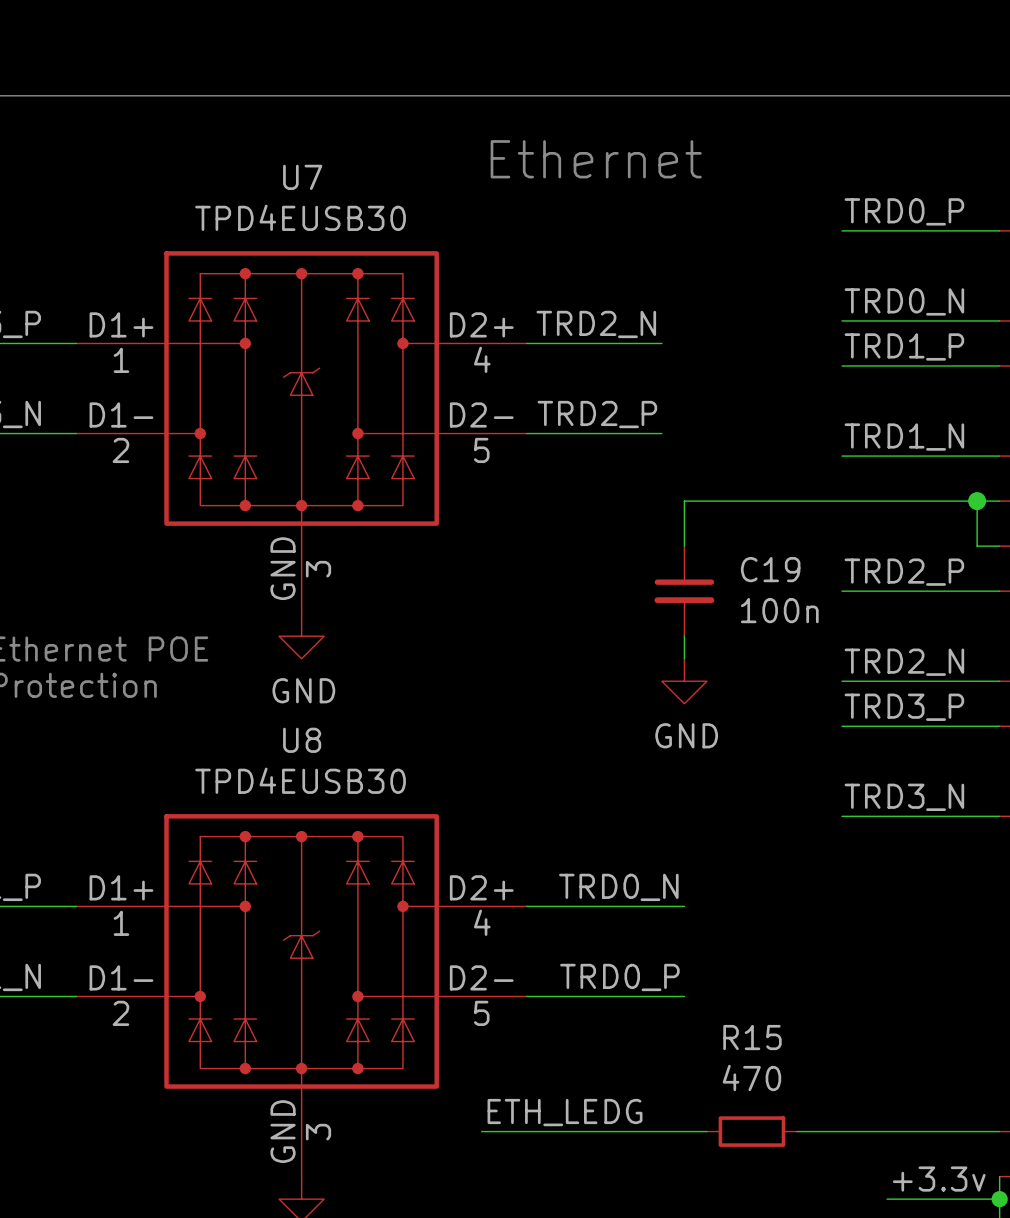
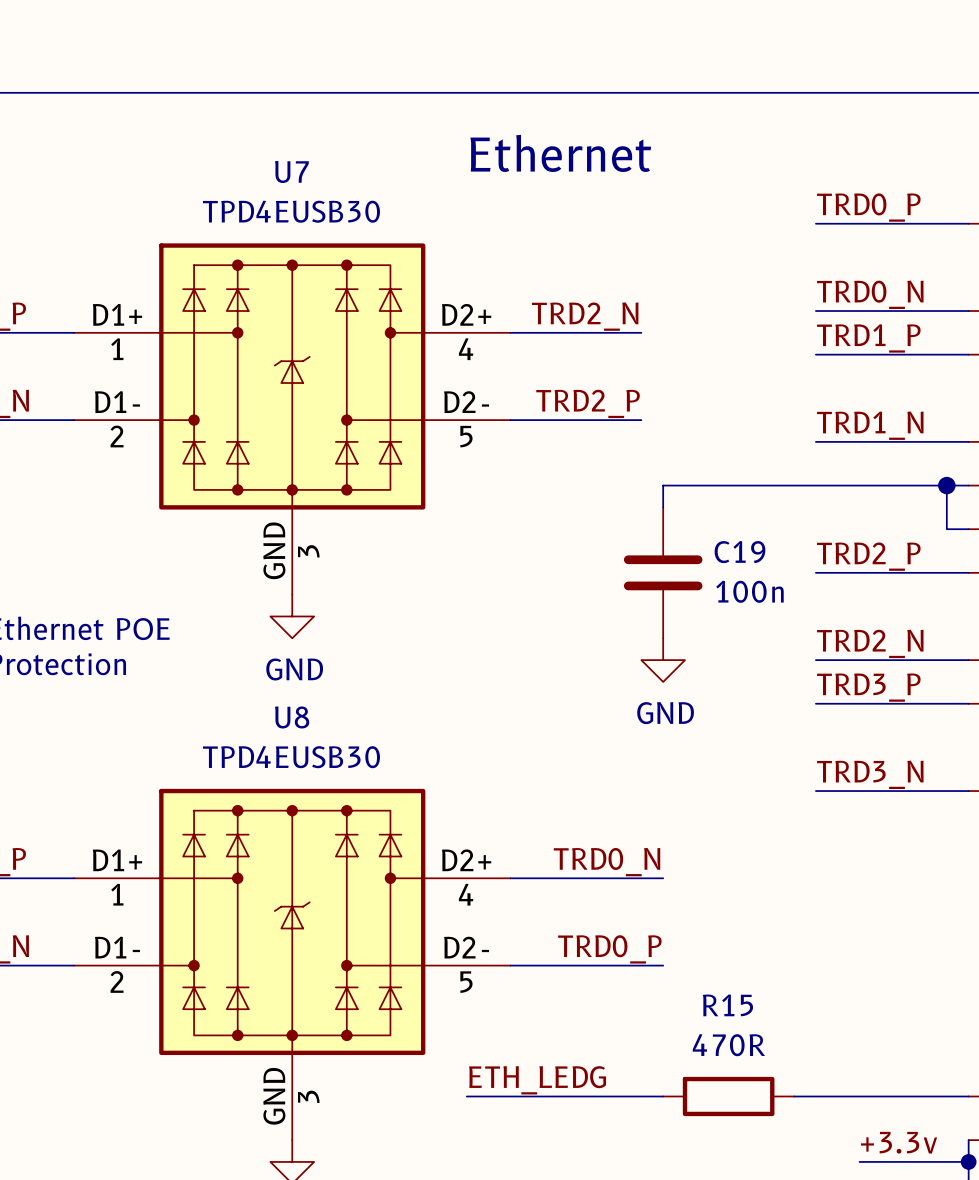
C19 symbol: [654, 546, 715, 637] -> [623, 507, 703, 639]
R15 value: 470 (751, 1077) -> 470R (728, 1045)
R15 symbol: [706, 1116, 797, 1147] -> [663, 1076, 795, 1117]

